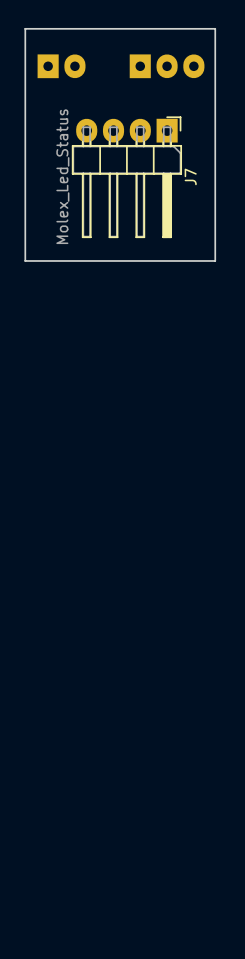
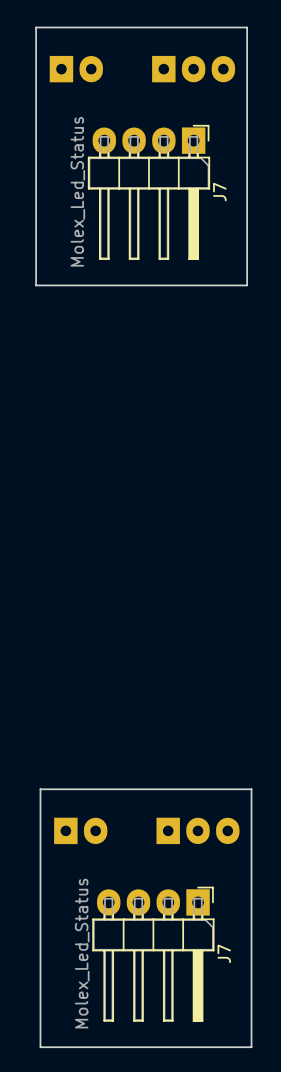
board edge: none -> (40, 789) (251, 789) (251, 1047) (40, 1047) (40, 789)
part: none -> (80, 830)
part: none -> (198, 830)
J7: none -> Molex_Led_Status (153, 954)

